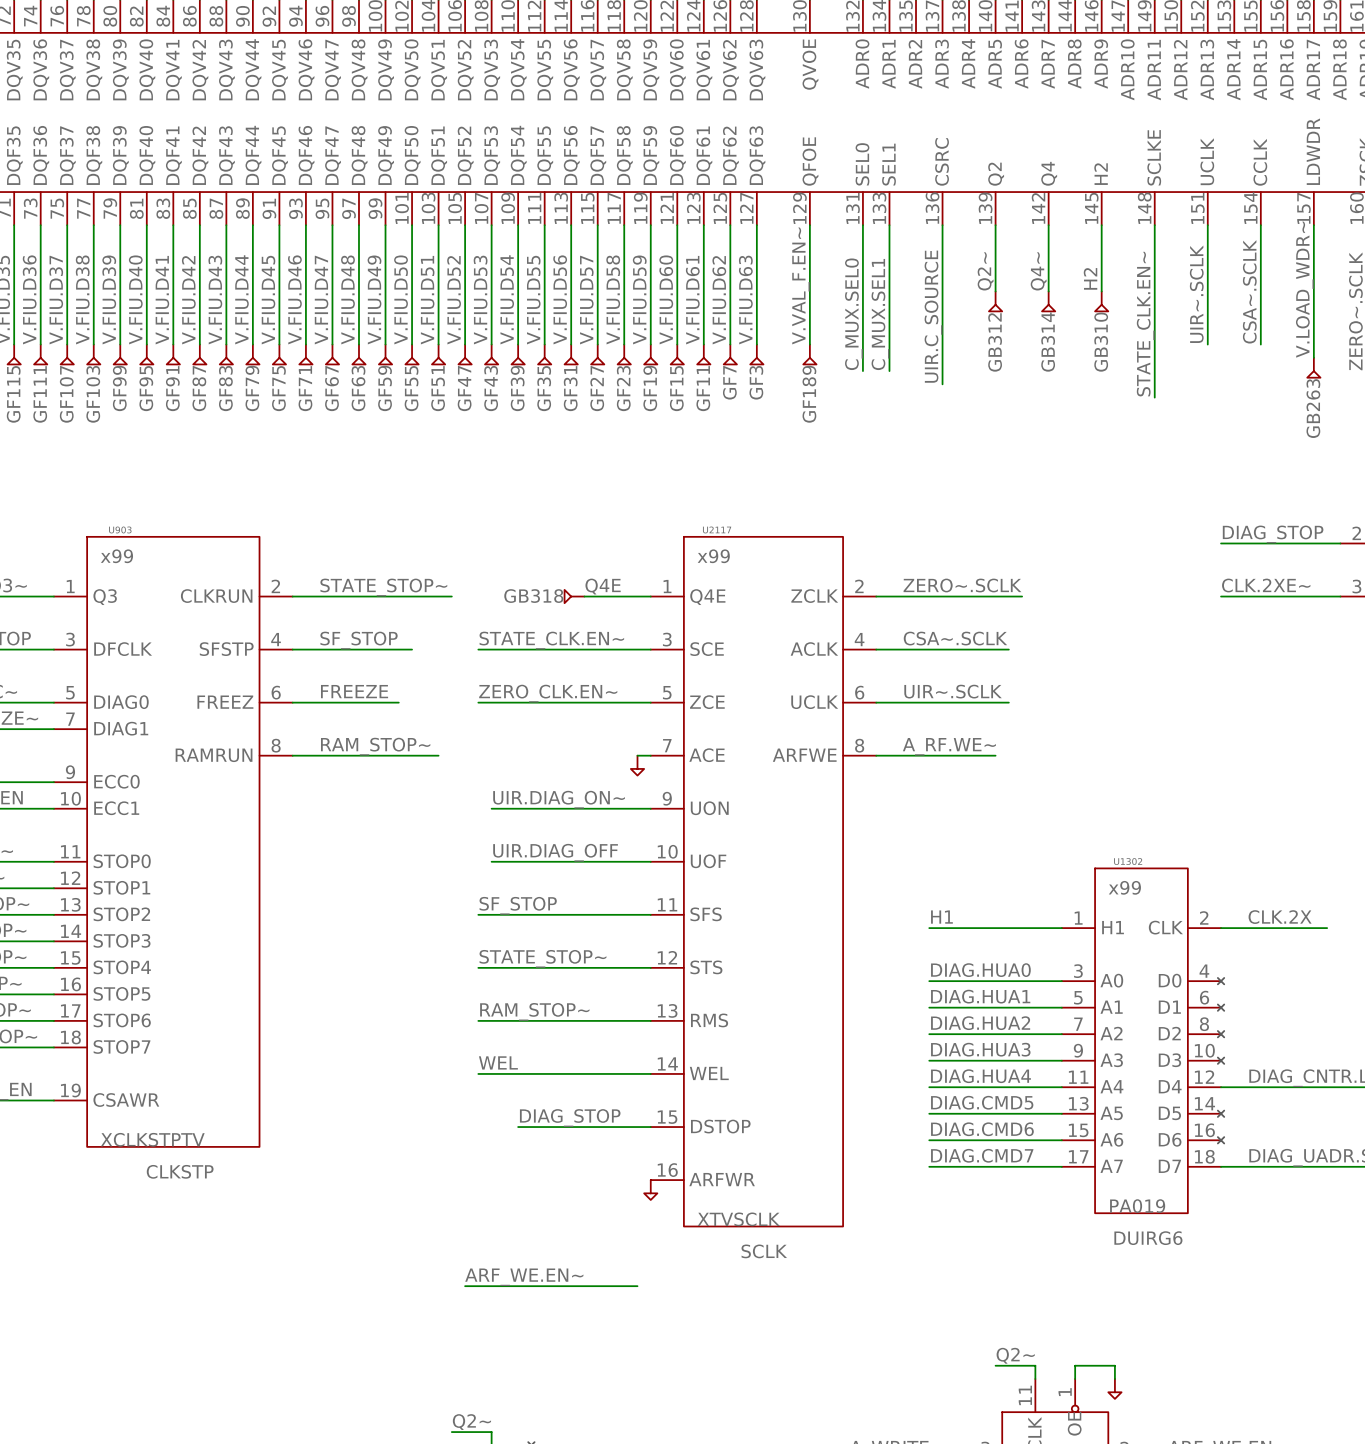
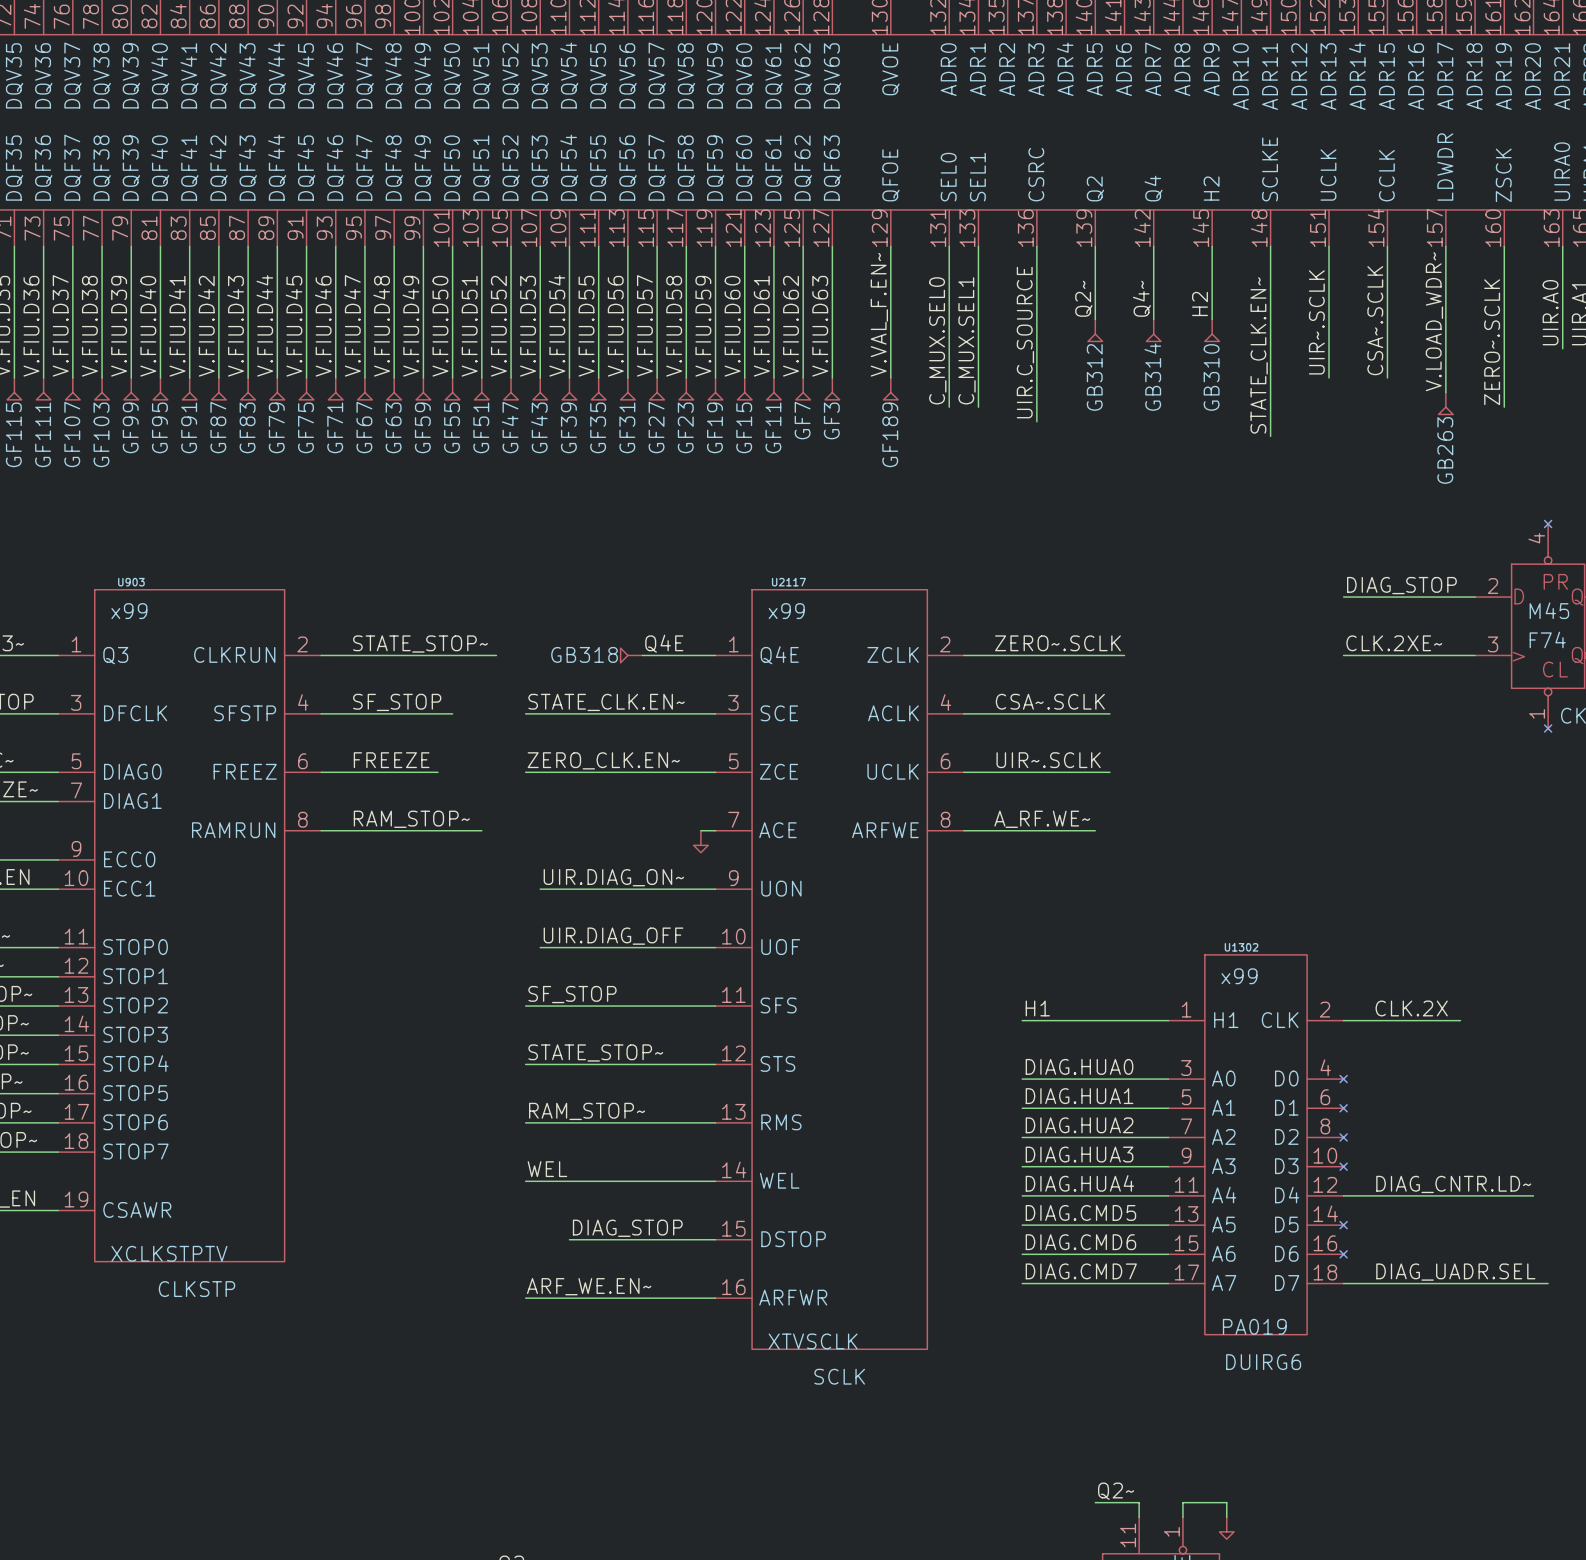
power symbol: (650, 1190) -> none
label position: ARF_WE.EN~ (524, 1277) -> ARF_WE.EN~ (589, 1286)
wire: (465, 1286) (637, 1286) -> (525, 1298) (715, 1298)

